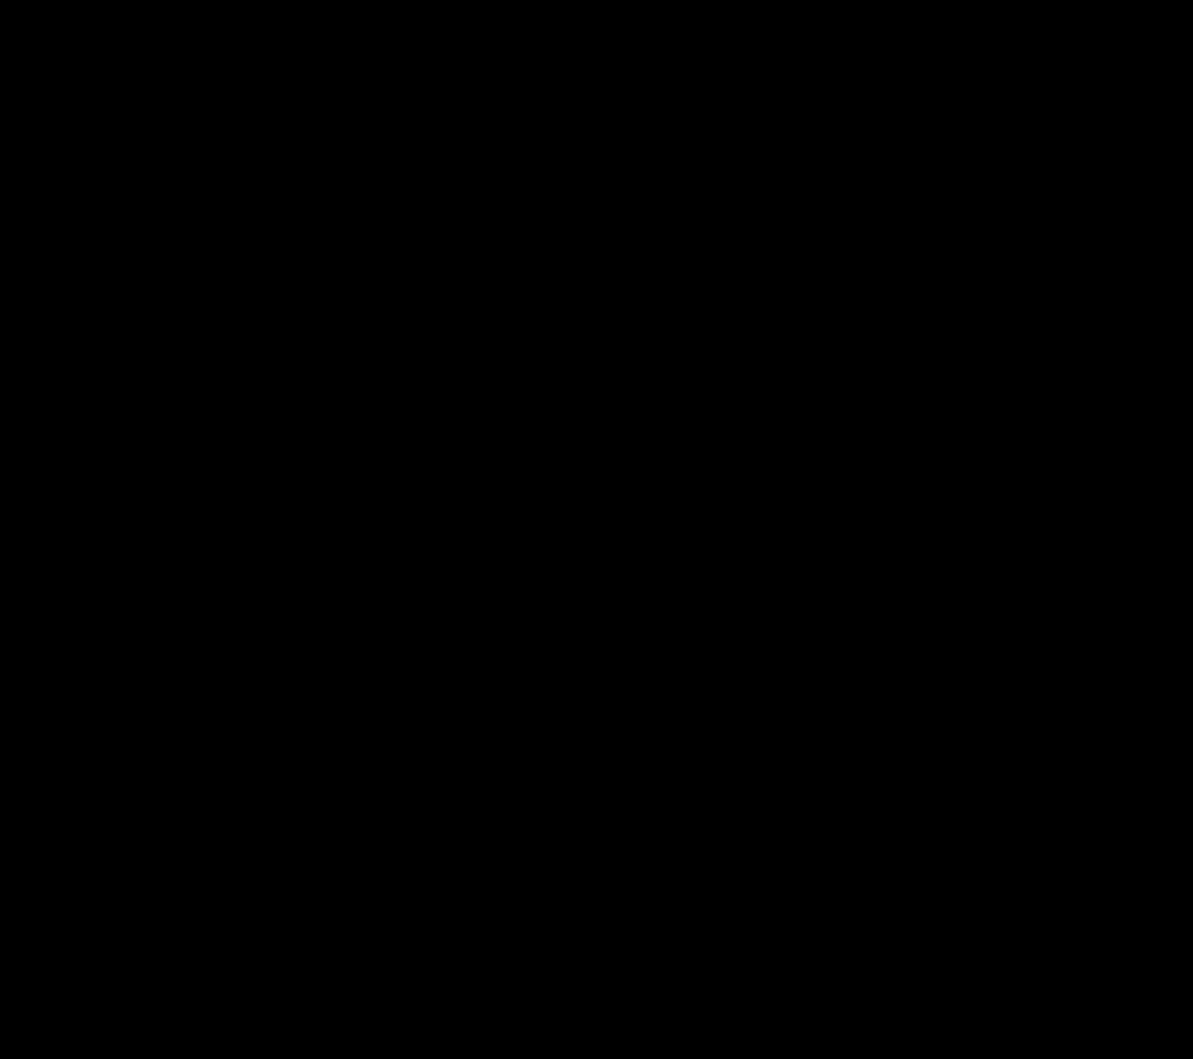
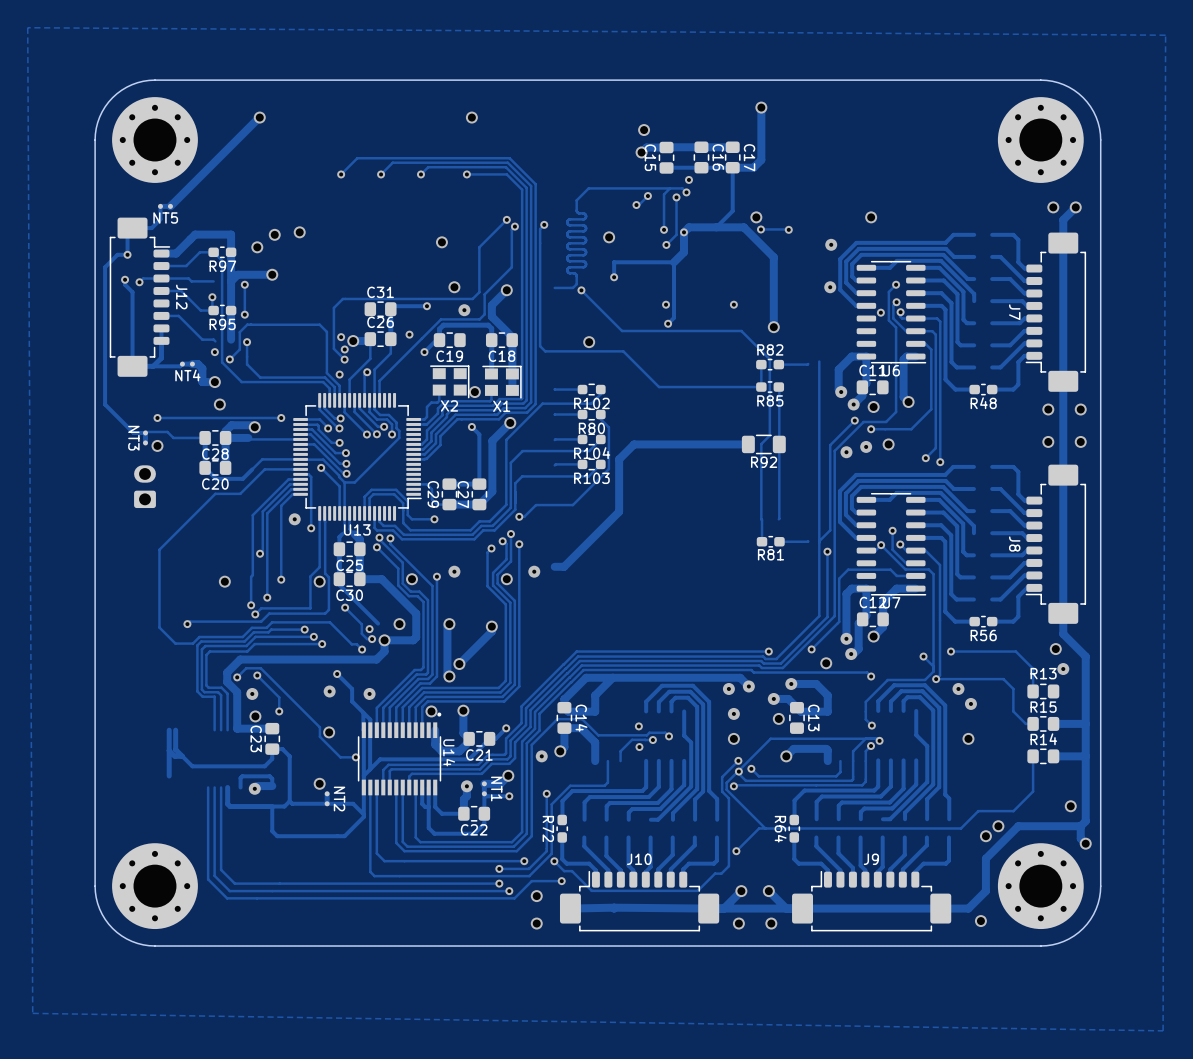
zone outline: none -> (27, 27) (1165, 35) (1163, 1030) (32, 1013) (27, 27)
board edge: none -> (1040, 80) (154, 80) (132, 84) (112, 97) (99, 117) (95, 140) (95, 886) (99, 909) (112, 928) (132, 941) (154, 946) (1040, 946) (1063, 941) (1083, 928) (1096, 909) (1100, 886) (1100, 134) (1096, 117) (1083, 97) (1063, 84) (1040, 80)
track: none -> (761, 107) (761, 159) (753, 167) (732, 167)
via: none -> (761, 107)
track: none -> (259, 117) (170, 206)
via: none -> (259, 117)
via: none -> (471, 117)
via: none -> (644, 130)
part: none -> (154, 140)
part: none -> (1040, 140)
track: none -> (732, 147) (646, 147) (641, 152)
via: none -> (641, 152)
C15: none -> (666, 157)
C16: none -> (701, 157)
C17: none -> (732, 157)
track: none -> (732, 167) (732, 211) (716, 227)
track: none -> (732, 167) (666, 167)
track: none -> (341, 174) (357, 158) (509, 158) (535, 184) (535, 404) (527, 412) (505, 412) (499, 419) (457, 419) (440, 436) (440, 445) (426, 458) (413, 459)
via: none -> (341, 174)
track: none -> (381, 174) (392, 162) (507, 162) (531, 186) (531, 402) (525, 408) (503, 408) (497, 414) (455, 414) (435, 434) (435, 443) (424, 454) (413, 454)
via: none -> (381, 174)
track: none -> (420, 174) (428, 167) (505, 167) (526, 187) (526, 400) (523, 403) (501, 403) (494, 410) (451, 410) (431, 432) (431, 441) (423, 449) (413, 449)
via: none -> (420, 174)
track: none -> (466, 174) (506, 174) (522, 189) (522, 398) (499, 399) (493, 405) (447, 405) (442, 410) (442, 415) (426, 430) (426, 439) (421, 444) (413, 444)
via: none -> (466, 174)
via: none -> (688, 179)
track: none -> (670, 188) (664, 194) (664, 229)
track: none -> (686, 192) (682, 188) (588, 188) (576, 200) (576, 211) (584, 214) (585, 218) (569, 219) (567, 222) (569, 225) (585, 227) (584, 231) (569, 231) (567, 234) (569, 237) (585, 238) (584, 243) (569, 243) (567, 246) (569, 249) (584, 249) (585, 253) (569, 255) (567, 258) (569, 261) (584, 261) (586, 264) (583, 267) (567, 268) (568, 272) (576, 275) (576, 284) (573, 287) (554, 287)
via: none -> (686, 192)
track: none -> (647, 196) (638, 205) (636, 205)
via: none -> (647, 196)
track: none -> (676, 197) (676, 234) (666, 244)
via: none -> (676, 197)
via: none -> (636, 205)
track: none -> (160, 206) (160, 219) (151, 228) (132, 228) (127, 233) (127, 254) (117, 254) (105, 267) (105, 404) (133, 432) (167, 431) (173, 437) (205, 437) (205, 467) (216, 478) (242, 478) (262, 459) (323, 459) (344, 482)
NT5: none -> (165, 206)
via: none -> (1053, 207)
track: none -> (1075, 207) (1063, 219) (1063, 634) (1085, 656) (1085, 821) (1080, 826)
via: none -> (1075, 207)
via: none -> (756, 217)
via: none -> (871, 217)
track: none -> (506, 219) (479, 247) (479, 292) (472, 298) (342, 298) (333, 307) (333, 348) (344, 359)
via: none -> (506, 219)
track: none -> (544, 224) (540, 228) (540, 346) (545, 351) (623, 351) (659, 387) (761, 387) (761, 364)
via: none -> (544, 224)
track: none -> (514, 226) (511, 229) (511, 267) (484, 294) (484, 314) (479, 319) (441, 319) (379, 380) (379, 400)
via: none -> (514, 226)
via: none -> (664, 229)
track: none -> (760, 229) (788, 229)
via: none -> (760, 229)
via: none -> (788, 229)
via: none -> (299, 232)
via: none -> (683, 232)
via: none -> (274, 234)
track: none -> (974, 234) (953, 234) (945, 242) (856, 242) (840, 259) (840, 289) (856, 305) (865, 305)
track: none -> (992, 234) (1013, 234) (1018, 239) (1018, 262) (1024, 268) (1034, 268)
via: none -> (609, 237)
via: none -> (441, 242)
via: none -> (666, 244)
via: none -> (831, 244)
via: none -> (257, 247)
R97: none -> (222, 252)
track: none -> (161, 253) (176, 253) (195, 234) (231, 234) (231, 339)
via: none -> (127, 254)
track: none -> (974, 256) (954, 256) (945, 248) (858, 248) (846, 261) (846, 282) (856, 293) (865, 293)
track: none -> (992, 256) (1000, 256) (1024, 281) (1034, 281)
track: none -> (674, 262) (614, 262) (614, 277)
track: none -> (674, 262) (674, 317) (668, 323)
track: none -> (674, 262) (683, 252) (683, 232) (688, 227) (743, 227) (773, 257) (773, 327)
track: none -> (161, 266) (186, 266) (199, 252) (213, 252) (222, 260) (222, 362) (241, 382) (323, 382) (329, 388) (329, 400)
track: none -> (865, 267) (890, 267) (897, 260) (941, 260) (974, 294) (974, 301)
track: none -> (915, 267) (939, 267) (963, 291) (963, 319) (967, 323) (974, 323)
track: none -> (272, 274) (237, 274) (231, 281)
via: none -> (272, 274)
via: none -> (614, 277)
track: none -> (125, 279) (125, 284) (132, 292) (132, 366) (153, 366)
via: none -> (125, 279)
track: none -> (974, 279) (967, 279) (943, 254) (861, 254) (852, 264) (852, 276) (856, 280) (865, 280)
track: none -> (992, 279) (1010, 279) (1024, 293) (1034, 293)
track: none -> (915, 280) (943, 280) (957, 294) (957, 342) (960, 345) (974, 345)
track: none -> (213, 281) (191, 281) (188, 278) (143, 278) (139, 282)
via: none -> (139, 282)
track: none -> (244, 284) (244, 314)
via: none -> (244, 284)
track: none -> (896, 284) (888, 291) (888, 320) (896, 327) (896, 412) (886, 421) (863, 421) (834, 450) (834, 616) (782, 668) (761, 668) (759, 665) (581, 665) (535, 712) (535, 728) (522, 741) (522, 832) (511, 842) (420, 842) (415, 837) (415, 787)
via: none -> (896, 284)
via: none -> (454, 287)
via: none -> (830, 287)
track: none -> (161, 290) (181, 290) (200, 310) (213, 310) (212, 297)
track: none -> (506, 290) (491, 305) (491, 316) (512, 336) (512, 390)
via: none -> (506, 290)
track: none -> (581, 290) (622, 331) (741, 331) (769, 359) (769, 435) (761, 444) (762, 541)
via: none -> (581, 290)
track: none -> (915, 293) (941, 293) (951, 303) (951, 362) (956, 367) (974, 367)
J12: none -> (139, 297)
via: none -> (212, 297)
track: none -> (992, 301) (1022, 301) (1027, 305) (1034, 305)
track: none -> (896, 302) (893, 305) (893, 318) (906, 331) (932, 331) (935, 334) (935, 448) (925, 458)
via: none -> (896, 302)
via: none -> (666, 304)
via: none -> (733, 304)
track: none -> (915, 305) (941, 305) (945, 309) (945, 379) (955, 389) (974, 389)
track: none -> (426, 306) (393, 306) (390, 309) (390, 353) (374, 369) (374, 409) (380, 415) (388, 415) (396, 422) (399, 437) (354, 482) (344, 482)
via: none -> (426, 306)
C31: none -> (380, 309)
R95: none -> (222, 310)
via: none -> (464, 310)
via: none -> (880, 312)
U6: none -> (891, 312)
track: none -> (900, 312) (902, 318) (937, 318) (940, 321) (940, 462)
via: none -> (900, 312)
J7: none -> (1055, 312)
via: none -> (244, 314)
track: none -> (161, 315) (178, 315) (202, 339) (215, 341)
track: none -> (1034, 318) (1024, 318) (1019, 323) (992, 323)
via: none -> (668, 323)
via: none -> (773, 327)
track: none -> (161, 328) (161, 358) (153, 366)
track: none -> (1034, 330) (1024, 330) (1010, 345) (992, 345)
via: none -> (409, 334)
via: none -> (341, 337)
C26: none -> (380, 339)
C19: none -> (449, 340)
C18: none -> (501, 340)
track: none -> (353, 341) (368, 341) (370, 339) (370, 358) (349, 379) (349, 400)
via: none -> (353, 341)
track: none -> (247, 342) (247, 364) (260, 377) (325, 377) (334, 387) (334, 400)
via: none -> (247, 342)
via: none -> (589, 342)
track: none -> (915, 343) (925, 343) (931, 349) (931, 409) (911, 429) (871, 429)
track: none -> (1034, 343) (1024, 343) (1000, 367) (992, 367)
via: none -> (344, 349)
via: none -> (214, 352)
track: none -> (424, 352) (436, 340) (439, 340) (439, 329) (443, 325) (488, 325) (491, 328) (491, 373)
via: none -> (424, 352)
track: none -> (1034, 355) (1024, 355) (1018, 362) (1018, 384) (1013, 389) (992, 389)
track: none -> (915, 356) (906, 356) (903, 359) (903, 397) (908, 402)
track: none -> (229, 359) (239, 349) (239, 332) (247, 324) (319, 324) (326, 331) (326, 373) (339, 385) (339, 400)
via: none -> (229, 359)
via: none -> (344, 359)
track: none -> (819, 361) (819, 616) (776, 659) (765, 659) (763, 656) (578, 656) (526, 708) (526, 725) (510, 740) (510, 756) (507, 759) (489, 759) (480, 769) (391, 769) (389, 771) (389, 787)
track: none -> (808, 363) (778, 364)
track: none -> (182, 364) (180, 366) (153, 366)
NT4: none -> (187, 364)
track: none -> (192, 364) (197, 364) (202, 368) (202, 382) (214, 382)
R82: none -> (770, 364)
track: none -> (367, 372) (364, 374) (364, 400)
via: none -> (367, 372)
via: none -> (339, 374)
X2: none -> (449, 381)
via: none -> (214, 382)
X1: none -> (501, 382)
R85: none -> (770, 387)
track: none -> (778, 387) (778, 519)
C11: none -> (872, 387)
track: none -> (554, 389) (582, 389)
R102: none -> (591, 389)
track: none -> (600, 389) (600, 394) (591, 403) (542, 403) (506, 439) (506, 504) (489, 521) (479, 521) (470, 530) (410, 530) (403, 523) (403, 510)
R48: none -> (983, 389)
track: none -> (439, 390) (439, 400) (431, 402) (426, 407) (426, 416) (424, 419) (413, 419)
track: none -> (491, 390) (490, 401) (445, 401) (437, 408) (437, 413) (426, 424) (413, 424)
via: none -> (474, 392)
track: none -> (841, 392) (838, 389) (838, 369) (851, 356) (866, 356) (866, 383) (862, 387) (862, 395) (853, 404)
via: none -> (841, 392)
track: none -> (319, 400) (319, 409) (339, 428)
track: none -> (324, 400) (324, 408) (334, 418) (340, 418)
track: none -> (344, 400) (344, 412) (366, 434)
track: none -> (354, 400) (354, 411) (376, 434)
track: none -> (359, 400) (359, 408) (378, 426) (384, 426)
track: none -> (369, 400) (369, 412) (377, 419) (387, 419) (392, 424) (392, 434)
via: none -> (908, 402)
via: none -> (219, 404)
via: none -> (853, 404)
via: none -> (873, 407)
via: none -> (1048, 409)
via: none -> (1080, 409)
track: none -> (582, 414) (554, 414)
R80: none -> (591, 414)
track: none -> (600, 414) (600, 419) (608, 427) (608, 469) (572, 505) (536, 505) (524, 516) (519, 516)
via: none -> (157, 417)
track: none -> (281, 417) (157, 417)
via: none -> (281, 417)
via: none -> (340, 418)
track: none -> (300, 419) (319, 419) (328, 428)
track: none -> (854, 420) (830, 445) (830, 530) (819, 541)
via: none -> (854, 420)
track: none -> (510, 422) (492, 440) (492, 491) (479, 504) (437, 504) (431, 499) (431, 489) (426, 484) (413, 484)
via: none -> (510, 422)
track: none -> (300, 424) (317, 424) (318, 429) (331, 442) (339, 442)
via: none -> (384, 426)
track: none -> (471, 426) (479, 434) (479, 484) (449, 484)
via: none -> (471, 426)
track: none -> (254, 427) (253, 425) (231, 425) (225, 431) (225, 467)
via: none -> (254, 427)
via: none -> (328, 428)
via: none -> (339, 428)
track: none -> (300, 429) (312, 429) (335, 453) (345, 453)
via: none -> (871, 429)
track: none -> (300, 434) (310, 434) (340, 463) (346, 463)
via: none -> (366, 434)
via: none -> (376, 434)
via: none -> (392, 434)
NT3: none -> (145, 437)
C28: none -> (215, 437)
track: none -> (225, 437) (300, 439)
track: none -> (582, 439) (554, 440)
R104: none -> (591, 439)
track: none -> (600, 439) (589, 451) (522, 451) (510, 462) (510, 507) (492, 525) (481, 525) (472, 534) (403, 534) (395, 525) (383, 525) (379, 521) (379, 513)
via: none -> (1048, 441)
via: none -> (1080, 441)
via: none -> (339, 442)
track: none -> (300, 444) (314, 444) (343, 473) (346, 473)
track: none -> (748, 444) (634, 444) (619, 459) (619, 511) (564, 566) (554, 566)
R92: none -> (763, 444)
via: none -> (888, 444)
via: none -> (157, 445)
via: none -> (866, 446)
via: none -> (846, 452)
via: none -> (345, 453)
U13: none -> (357, 456)
via: none -> (925, 458)
via: none -> (940, 462)
via: none -> (346, 463)
track: none -> (582, 464) (554, 465)
R103: none -> (591, 464)
track: none -> (600, 464) (588, 476) (522, 476) (515, 483) (515, 509) (494, 530) (483, 530) (474, 539) (402, 539) (393, 530) (377, 530) (374, 527) (374, 513)
track: none -> (973, 466) (953, 466) (945, 474) (856, 474) (839, 491) (839, 521) (855, 537) (865, 537)
track: none -> (992, 466) (1013, 466) (1018, 471) (1018, 494) (1024, 500) (1034, 500)
C20: none -> (215, 467)
track: none -> (321, 467) (339, 486) (339, 513)
via: none -> (321, 467)
track: none -> (300, 469) (264, 469) (240, 493) (215, 493) (159, 549) (159, 627) (175, 643) (192, 643) (199, 637) (242, 637) (251, 627) (266, 627) (272, 622) (329, 622) (351, 644) (356, 644) (362, 649)
via: none -> (346, 473)
track: none -> (300, 474) (308, 474) (311, 476) (311, 528)
track: none -> (300, 479) (288, 479) (252, 515) (251, 605)
track: none -> (344, 482) (344, 531) (339, 537) (339, 584) (378, 623)
track: none -> (300, 484) (290, 484) (262, 511) (262, 550) (260, 553)
part: none -> (145, 486)
track: none -> (300, 489) (291, 489) (267, 513) (267, 597)
track: none -> (973, 489) (953, 489) (945, 480) (858, 480) (845, 493) (845, 514) (856, 525) (865, 525)
track: none -> (992, 489) (1000, 489) (1024, 513) (1034, 513)
track: none -> (300, 494) (292, 494) (281, 505) (281, 579)
C29: none -> (449, 494)
C27: none -> (479, 494)
track: none -> (865, 499) (889, 499) (896, 492) (940, 492) (973, 526) (973, 533)
track: none -> (915, 499) (939, 499) (963, 523) (963, 551) (966, 555) (973, 555)
track: none -> (403, 510) (403, 503) (394, 494) (373, 494) (369, 498) (369, 513)
track: none -> (973, 511) (967, 511) (943, 486) (861, 486) (851, 496) (851, 508) (855, 512) (865, 512)
track: none -> (992, 511) (1010, 511) (1024, 525) (1034, 525)
track: none -> (915, 512) (943, 512) (957, 526) (957, 574) (960, 577) (973, 577)
track: none -> (319, 513) (319, 567) (310, 576) (310, 608) (261, 608) (255, 614)
track: none -> (324, 513) (325, 573) (328, 577) (328, 609) (325, 613) (269, 613) (261, 621) (189, 621) (187, 624)
track: none -> (349, 513) (349, 529) (359, 539) (359, 579) (381, 579) (416, 613) (416, 637) (413, 640) (384, 640) (384, 651) (376, 659) (240, 659) (227, 672) (227, 682) (237, 692) (237, 728) (272, 728)
track: none -> (364, 513) (364, 496) (371, 489) (396, 489) (407, 501) (407, 515) (412, 519) (434, 519)
via: none -> (519, 516)
via: none -> (294, 519)
via: none -> (434, 519)
track: none -> (915, 525) (941, 525) (951, 535) (951, 594) (956, 599) (973, 599)
via: none -> (311, 528)
track: none -> (892, 530) (892, 549) (906, 563) (915, 563)
via: none -> (892, 530)
track: none -> (992, 533) (1022, 533) (1027, 538) (1034, 538)
track: none -> (511, 534) (511, 561) (497, 574) (497, 583) (514, 600) (514, 684) (502, 696) (425, 696) (415, 707) (415, 730)
via: none -> (511, 534)
track: none -> (379, 537) (402, 562) (402, 583) (410, 591) (419, 591) (427, 600) (427, 672) (416, 674) (383, 707) (383, 730)
via: none -> (379, 537)
track: none -> (915, 537) (941, 537) (945, 541) (945, 611) (955, 621) (973, 621)
track: none -> (390, 538) (390, 544) (432, 586) (432, 674) (428, 679) (418, 679) (389, 707) (389, 730)
via: none -> (390, 538)
track: none -> (502, 541) (506, 543) (506, 559) (493, 572) (493, 585) (510, 602) (510, 682) (500, 692) (424, 692) (409, 707) (409, 730)
via: none -> (502, 541)
R81: none -> (770, 541)
track: none -> (808, 541) (779, 541)
track: none -> (519, 544) (519, 686) (504, 701) (427, 701) (422, 707) (422, 730)
via: none -> (519, 544)
U7: none -> (891, 544)
track: none -> (900, 544) (906, 550) (925, 550) (940, 565) (940, 675) (936, 679) (1003, 679) (1013, 688) (1013, 711) (1025, 723) (1033, 723)
via: none -> (900, 544)
J8: none -> (1055, 544)
via: none -> (881, 545)
track: none -> (376, 547) (398, 568) (398, 585) (408, 596) (417, 596) (423, 602) (423, 667) (420, 670) (414, 670) (376, 707) (376, 730)
via: none -> (376, 547)
track: none -> (491, 548) (487, 552) (487, 586) (505, 604) (505, 680) (498, 687) (422, 687) (402, 707) (402, 730)
via: none -> (491, 548)
C25: none -> (349, 549)
track: none -> (866, 550) (875, 550) (881, 545) (905, 569) (928, 569) (933, 574) (933, 671) (925, 680) (887, 680) (865, 701) (865, 719) (871, 725)
track: none -> (1034, 550) (1027, 550) (1022, 555) (992, 555)
track: none -> (827, 551) (827, 617) (780, 663) (763, 663) (761, 661) (579, 661) (530, 710) (530, 726) (515, 742) (515, 758) (509, 763) (491, 763) (481, 773) (412, 773) (409, 776) (409, 787)
via: none -> (827, 551)
via: none -> (260, 553)
track: none -> (1034, 562) (1024, 562) (1010, 577) (992, 577)
via: none -> (454, 571)
via: none -> (534, 571)
track: none -> (915, 575) (896, 575) (890, 569) (848, 569) (839, 578) (839, 621) (811, 649)
track: none -> (1034, 575) (1024, 575) (1000, 599) (992, 599)
track: none -> (436, 576) (436, 676) (429, 683) (420, 683) (396, 707) (396, 730)
via: none -> (436, 576)
via: none -> (281, 579)
C30: none -> (349, 579)
via: none -> (412, 579)
via: none -> (506, 579)
via: none -> (224, 581)
via: none -> (319, 581)
track: none -> (1034, 587) (1027, 587) (1018, 596) (1018, 616) (1013, 621) (992, 621)
track: none -> (915, 588) (896, 588) (883, 602) (883, 627) (873, 636)
via: none -> (267, 597)
via: none -> (251, 605)
track: none -> (345, 607) (361, 624) (361, 633) (367, 639) (372, 639)
via: none -> (345, 607)
via: none -> (255, 614)
C12: none -> (872, 619)
R56: none -> (983, 621)
via: none -> (187, 624)
via: none -> (399, 624)
track: none -> (449, 624) (447, 626) (447, 674) (449, 676)
via: none -> (449, 624)
track: none -> (491, 626) (491, 631) (459, 664)
via: none -> (491, 626)
track: none -> (304, 629) (271, 629) (268, 632) (253, 632) (244, 641) (201, 641) (197, 645) (197, 691) (202, 696) (214, 696) (214, 730)
via: none -> (304, 629)
via: none -> (369, 629)
track: none -> (313, 636) (255, 636) (246, 646) (205, 646) (201, 649) (201, 689) (204, 692) (218, 692) (221, 695) (221, 730)
via: none -> (313, 636)
via: none -> (873, 636)
track: none -> (846, 638) (846, 593) (851, 588) (866, 588) (866, 615) (858, 623) (858, 649) (851, 654)
via: none -> (846, 638)
via: none -> (372, 639)
via: none -> (384, 640)
track: none -> (322, 644) (254, 644) (247, 651) (209, 651) (206, 655) (206, 685) (208, 687) (221, 687) (227, 693) (227, 730)
via: none -> (322, 644)
via: none -> (362, 649)
via: none -> (811, 649)
via: none -> (1055, 649)
track: none -> (768, 651) (576, 651) (521, 706) (521, 723) (506, 738) (504, 754) (488, 754) (478, 764) (388, 764) (383, 770) (383, 787)
via: none -> (768, 651)
track: none -> (950, 651) (1015, 651) (1033, 668) (1033, 691)
via: none -> (950, 651)
via: none -> (851, 654)
track: none -> (923, 656) (933, 666)
via: none -> (923, 656)
via: none -> (826, 663)
via: none -> (459, 664)
via: none -> (1063, 669)
track: none -> (337, 674) (352, 688) (352, 701) (370, 719) (370, 730)
via: none -> (337, 674)
track: none -> (257, 675) (279, 697) (279, 711)
via: none -> (257, 675)
via: none -> (449, 676)
track: none -> (871, 676) (867, 672) (583, 670) (539, 713) (539, 730) (526, 743) (526, 833) (513, 846) (407, 846) (402, 841) (402, 787)
via: none -> (871, 676)
track: none -> (237, 677) (246, 668) (260, 668) (319, 727) (319, 736) (340, 757) (355, 757)
via: none -> (237, 677)
track: none -> (612, 677) (595, 695) (595, 711) (568, 711) (564, 707) (564, 699) (586, 677) (740, 677) (748, 686)
via: none -> (936, 679)
track: none -> (791, 683) (816, 683) (827, 695) (827, 711) (800, 711) (788, 698) (773, 698)
via: none -> (791, 683)
via: none -> (748, 686)
via: none -> (728, 688)
via: none -> (958, 688)
via: none -> (329, 691)
R13: none -> (1043, 691)
via: none -> (252, 693)
via: none -> (369, 693)
via: none -> (773, 698)
via: none -> (970, 703)
track: none -> (463, 710) (463, 733) (469, 738) (469, 741) (459, 751) (441, 751) (435, 744) (435, 730)
via: none -> (463, 710)
track: none -> (878, 710) (878, 701) (894, 685) (924, 685) (945, 705) (945, 794) (949, 798) (949, 819)
track: none -> (890, 710) (890, 701) (901, 691) (922, 691) (939, 707) (939, 787) (927, 799) (927, 819)
track: none -> (903, 710) (903, 701) (907, 697) (920, 697) (933, 710) (933, 784) (905, 812) (905, 819)
track: none -> (916, 710) (916, 735) (927, 746) (927, 782) (890, 819) (882, 819)
via: none -> (279, 711)
via: none -> (431, 711)
track: none -> (646, 711) (646, 701) (662, 685) (692, 685) (709, 701) (709, 791) (717, 799) (717, 819)
track: none -> (658, 711) (658, 702) (669, 691) (690, 691) (703, 704) (703, 791) (695, 799) (695, 819)
track: none -> (671, 711) (671, 701) (675, 697) (687, 697) (697, 706) (697, 789) (672, 813) (672, 819)
track: none -> (684, 711) (684, 735) (691, 742) (691, 786) (658, 819) (650, 819)
track: none -> (363, 712) (363, 816) (344, 836) (277, 836) (272, 831) (272, 806)
via: none -> (733, 713)
via: none -> (255, 716)
C14: none -> (564, 717)
C13: none -> (796, 717)
via: none -> (778, 718)
R15: none -> (1043, 723)
track: none -> (1085, 723) (1053, 723)
via: none -> (871, 725)
via: none -> (638, 726)
track: none -> (506, 728) (495, 738) (489, 738) (469, 759) (380, 759) (363, 775)
via: none -> (506, 728)
track: none -> (169, 730) (169, 776)
track: none -> (175, 730) (175, 749) (182, 756)
track: none -> (370, 730) (370, 769)
via: none -> (329, 732)
track: none -> (669, 736) (665, 732) (649, 732) (646, 735) (598, 735) (582, 719) (557, 719) (531, 744) (531, 836) (516, 851) (404, 851) (396, 842) (396, 787)
via: none -> (669, 736)
C23: none -> (272, 738)
C21: none -> (479, 738)
via: none -> (733, 738)
track: none -> (865, 738) (853, 751) (851, 780) (745, 780) (738, 771)
via: none -> (968, 738)
track: none -> (652, 740) (632, 739) (620, 751) (620, 761)
via: none -> (652, 740)
track: none -> (879, 740) (877, 738) (770, 738) (726, 782) (726, 789) (765, 828)
via: none -> (879, 740)
track: none -> (871, 746) (865, 751) (865, 781) (862, 785) (733, 786)
via: none -> (871, 746)
via: none -> (639, 747)
track: none -> (169, 750) (174, 756) (182, 756)
track: none -> (560, 751) (564, 747) (564, 728) (580, 728) (595, 742) (595, 761)
via: none -> (560, 751)
U14: none -> (399, 753)
track: none -> (182, 756) (192, 766) (264, 766) (272, 758) (272, 749) (282, 749) (289, 756) (289, 801)
via: none -> (541, 756)
track: none -> (786, 756) (793, 748) (826, 748) (827, 761)
via: none -> (786, 756)
track: none -> (1033, 756) (1033, 791) (1013, 811) (978, 811) (960, 828) (759, 828) (736, 851)
R14: none -> (1043, 756)
track: none -> (1085, 756) (1053, 756)
via: none -> (355, 757)
track: none -> (646, 760) (646, 787) (642, 791) (572, 791) (562, 801) (562, 819)
track: none -> (658, 760) (658, 787) (648, 797) (589, 797) (584, 802) (584, 819)
track: none -> (671, 760) (671, 789) (657, 803) (609, 803) (606, 806) (606, 819)
track: none -> (684, 760) (684, 785) (660, 809) (632, 809) (628, 812) (628, 819)
track: none -> (738, 760) (722, 777) (722, 791) (728, 798) (728, 866) (721, 873) (715, 873) (697, 890) (591, 890) (572, 871) (564, 871) (554, 861)
via: none -> (738, 760)
track: none -> (878, 760) (878, 786) (874, 790) (804, 790) (794, 800) (794, 819)
track: none -> (890, 760) (890, 786) (880, 796) (821, 796) (816, 801) (816, 819)
track: none -> (903, 760) (903, 788) (889, 802) (841, 802) (838, 805) (838, 819)
track: none -> (916, 760) (916, 784) (892, 808) (864, 808) (860, 812) (860, 819)
track: none -> (607, 761) (607, 782) (604, 785) (570, 785) (551, 804) (551, 853) (529, 876) (374, 876) (370, 871) (370, 787)
track: none -> (840, 761) (840, 772) (836, 776) (758, 776) (751, 768)
via: none -> (751, 768)
via: none -> (738, 771)
track: none -> (508, 775) (500, 783) (484, 783)
via: none -> (508, 775)
via: none -> (319, 783)
track: none -> (466, 786) (466, 796) (463, 799) (463, 813) (441, 813) (435, 807) (435, 787)
via: none -> (466, 786)
via: none -> (733, 786)
track: none -> (208, 787) (208, 879) (227, 898) (514, 898) (531, 881) (561, 881)
track: none -> (214, 787) (214, 875) (229, 891) (509, 891)
track: none -> (221, 787) (221, 869) (234, 883) (499, 883)
track: none -> (227, 787) (227, 804) (230, 806) (272, 806)
track: none -> (240, 787) (242, 776) (269, 776) (272, 778) (272, 786) (257, 786) (254, 788)
track: none -> (376, 787) (376, 853) (384, 861) (524, 861)
track: none -> (422, 787) (422, 804) (428, 807)
track: none -> (428, 787) (428, 827) (434, 833) (474, 833) (484, 823) (484, 793) (486, 796) (509, 796)
via: none -> (254, 788)
NT1: none -> (484, 788)
track: none -> (546, 793) (546, 851) (529, 868) (499, 868)
via: none -> (546, 793)
via: none -> (509, 796)
NT2: none -> (327, 798)
track: none -> (289, 801) (284, 806) (272, 806)
track: none -> (289, 801) (292, 803) (353, 803) (363, 814)
via: none -> (1070, 806)
C22: none -> (474, 813)
via: none -> (998, 826)
track: none -> (1080, 826) (1018, 826) (985, 858) (985, 891) (968, 908) (614, 907)
track: none -> (1080, 826) (1080, 838) (1085, 843)
R72: none -> (562, 828)
R64: none -> (794, 828)
via: none -> (985, 836)
track: none -> (562, 837) (562, 859) (566, 863) (589, 863) (595, 870) (595, 879)
track: none -> (584, 837) (584, 846) (608, 870) (608, 879)
track: none -> (606, 837) (606, 855) (620, 870) (620, 879)
track: none -> (628, 837) (628, 865) (633, 870) (633, 879)
track: none -> (650, 837) (650, 867) (645, 871) (645, 879)
track: none -> (672, 837) (672, 854) (658, 869) (658, 879)
track: none -> (694, 837) (694, 845) (670, 869) (670, 879)
track: none -> (716, 837) (716, 860) (713, 863) (688, 863) (683, 869) (683, 879)
track: none -> (794, 837) (794, 859) (798, 863) (821, 863) (827, 870) (827, 879)
track: none -> (816, 837) (816, 846) (840, 870) (840, 879)
track: none -> (838, 837) (838, 853) (852, 867) (852, 879)
track: none -> (860, 837) (860, 865) (865, 870) (865, 879)
track: none -> (882, 837) (882, 867) (877, 871) (877, 879)
track: none -> (904, 837) (904, 854) (890, 869) (890, 879)
track: none -> (926, 837) (926, 845) (902, 869) (902, 879)
track: none -> (949, 837) (949, 860) (946, 863) (923, 863) (915, 871) (915, 879)
via: none -> (1085, 843)
via: none -> (736, 851)
via: none -> (524, 861)
via: none -> (554, 861)
via: none -> (499, 868)
via: none -> (561, 881)
via: none -> (499, 883)
part: none -> (154, 886)
part: none -> (1040, 886)
via: none -> (509, 891)
track: none -> (741, 891) (723, 908)
via: none -> (741, 891)
track: none -> (768, 891) (786, 908)
via: none -> (768, 891)
via: none -> (536, 896)
J10: none -> (639, 901)
J9: none -> (871, 901)
track: none -> (614, 907) (570, 908)
via: none -> (980, 921)
via: none -> (536, 923)
via: none -> (738, 923)
via: none -> (771, 923)

